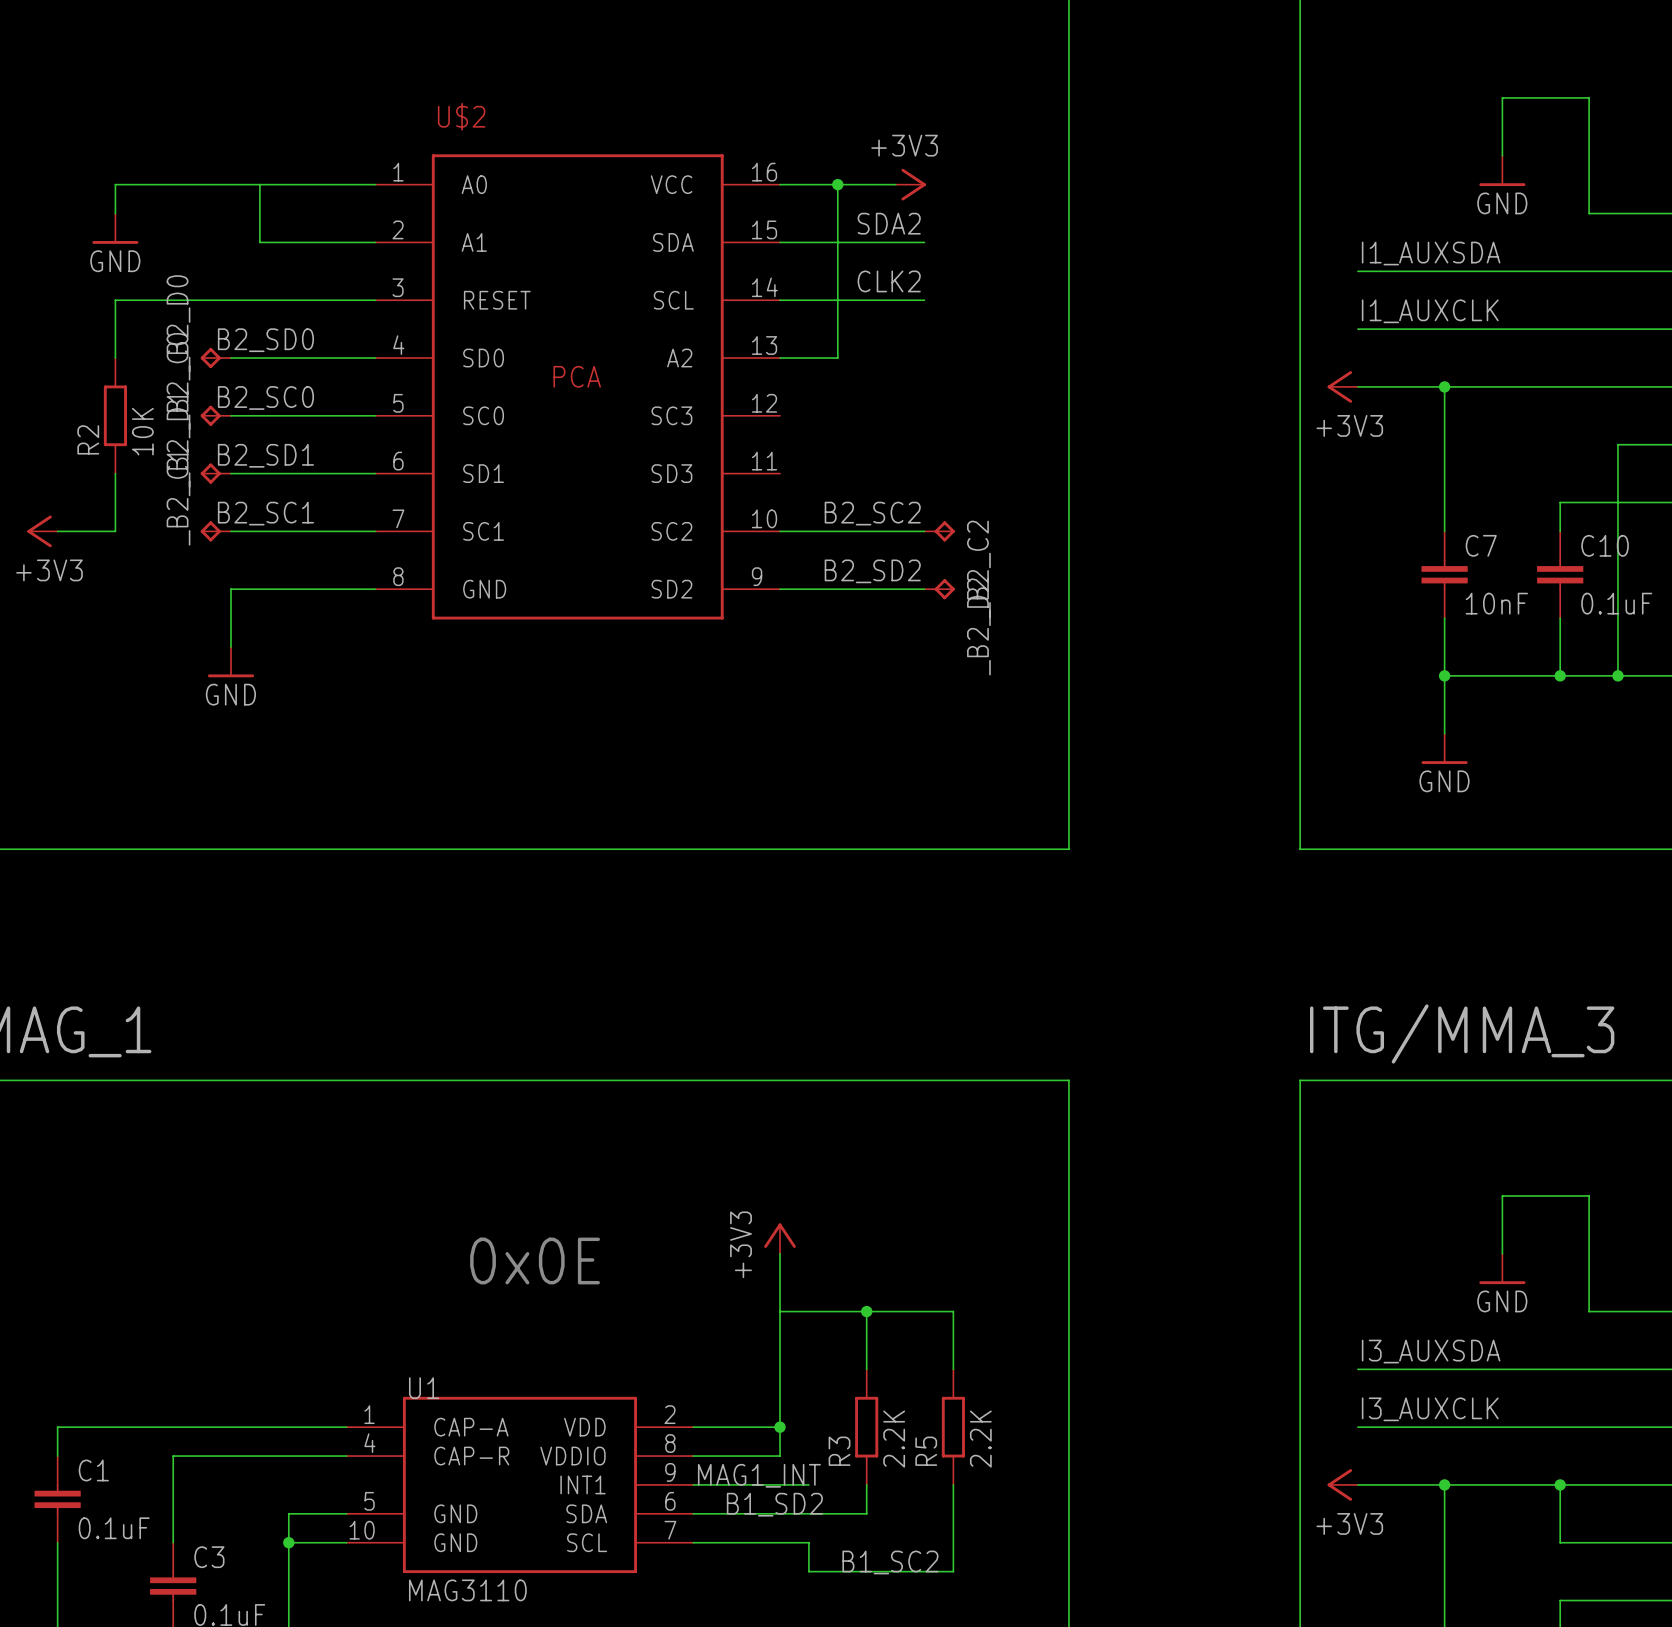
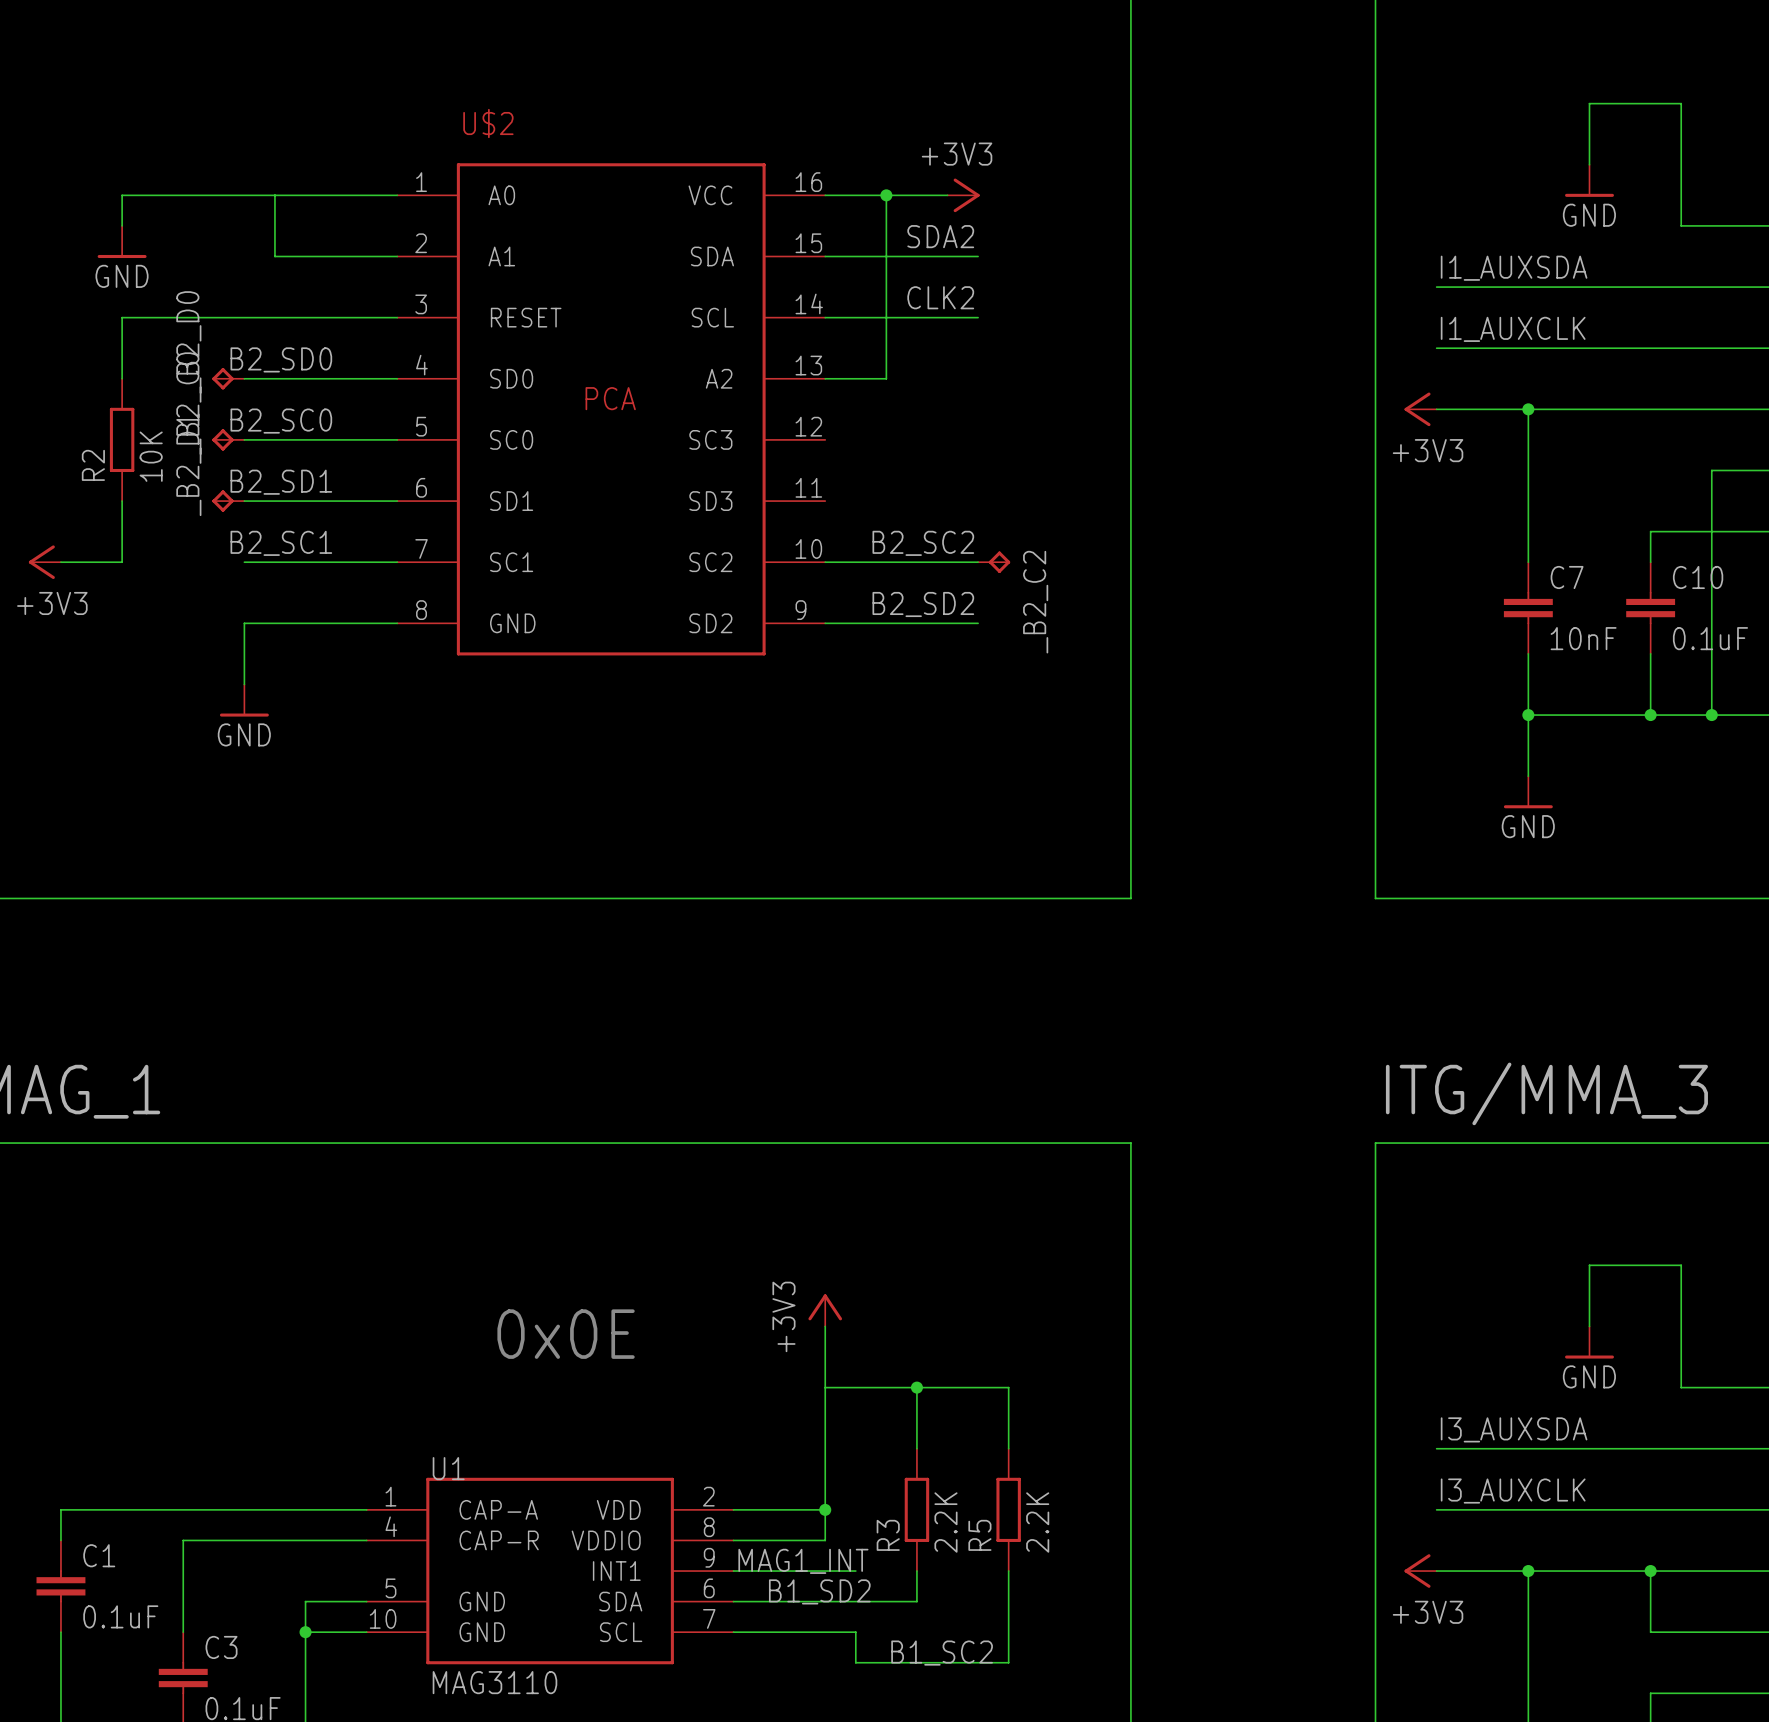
_B2_C1: (215, 531) -> none
_B2_D2: (939, 589) -> none

